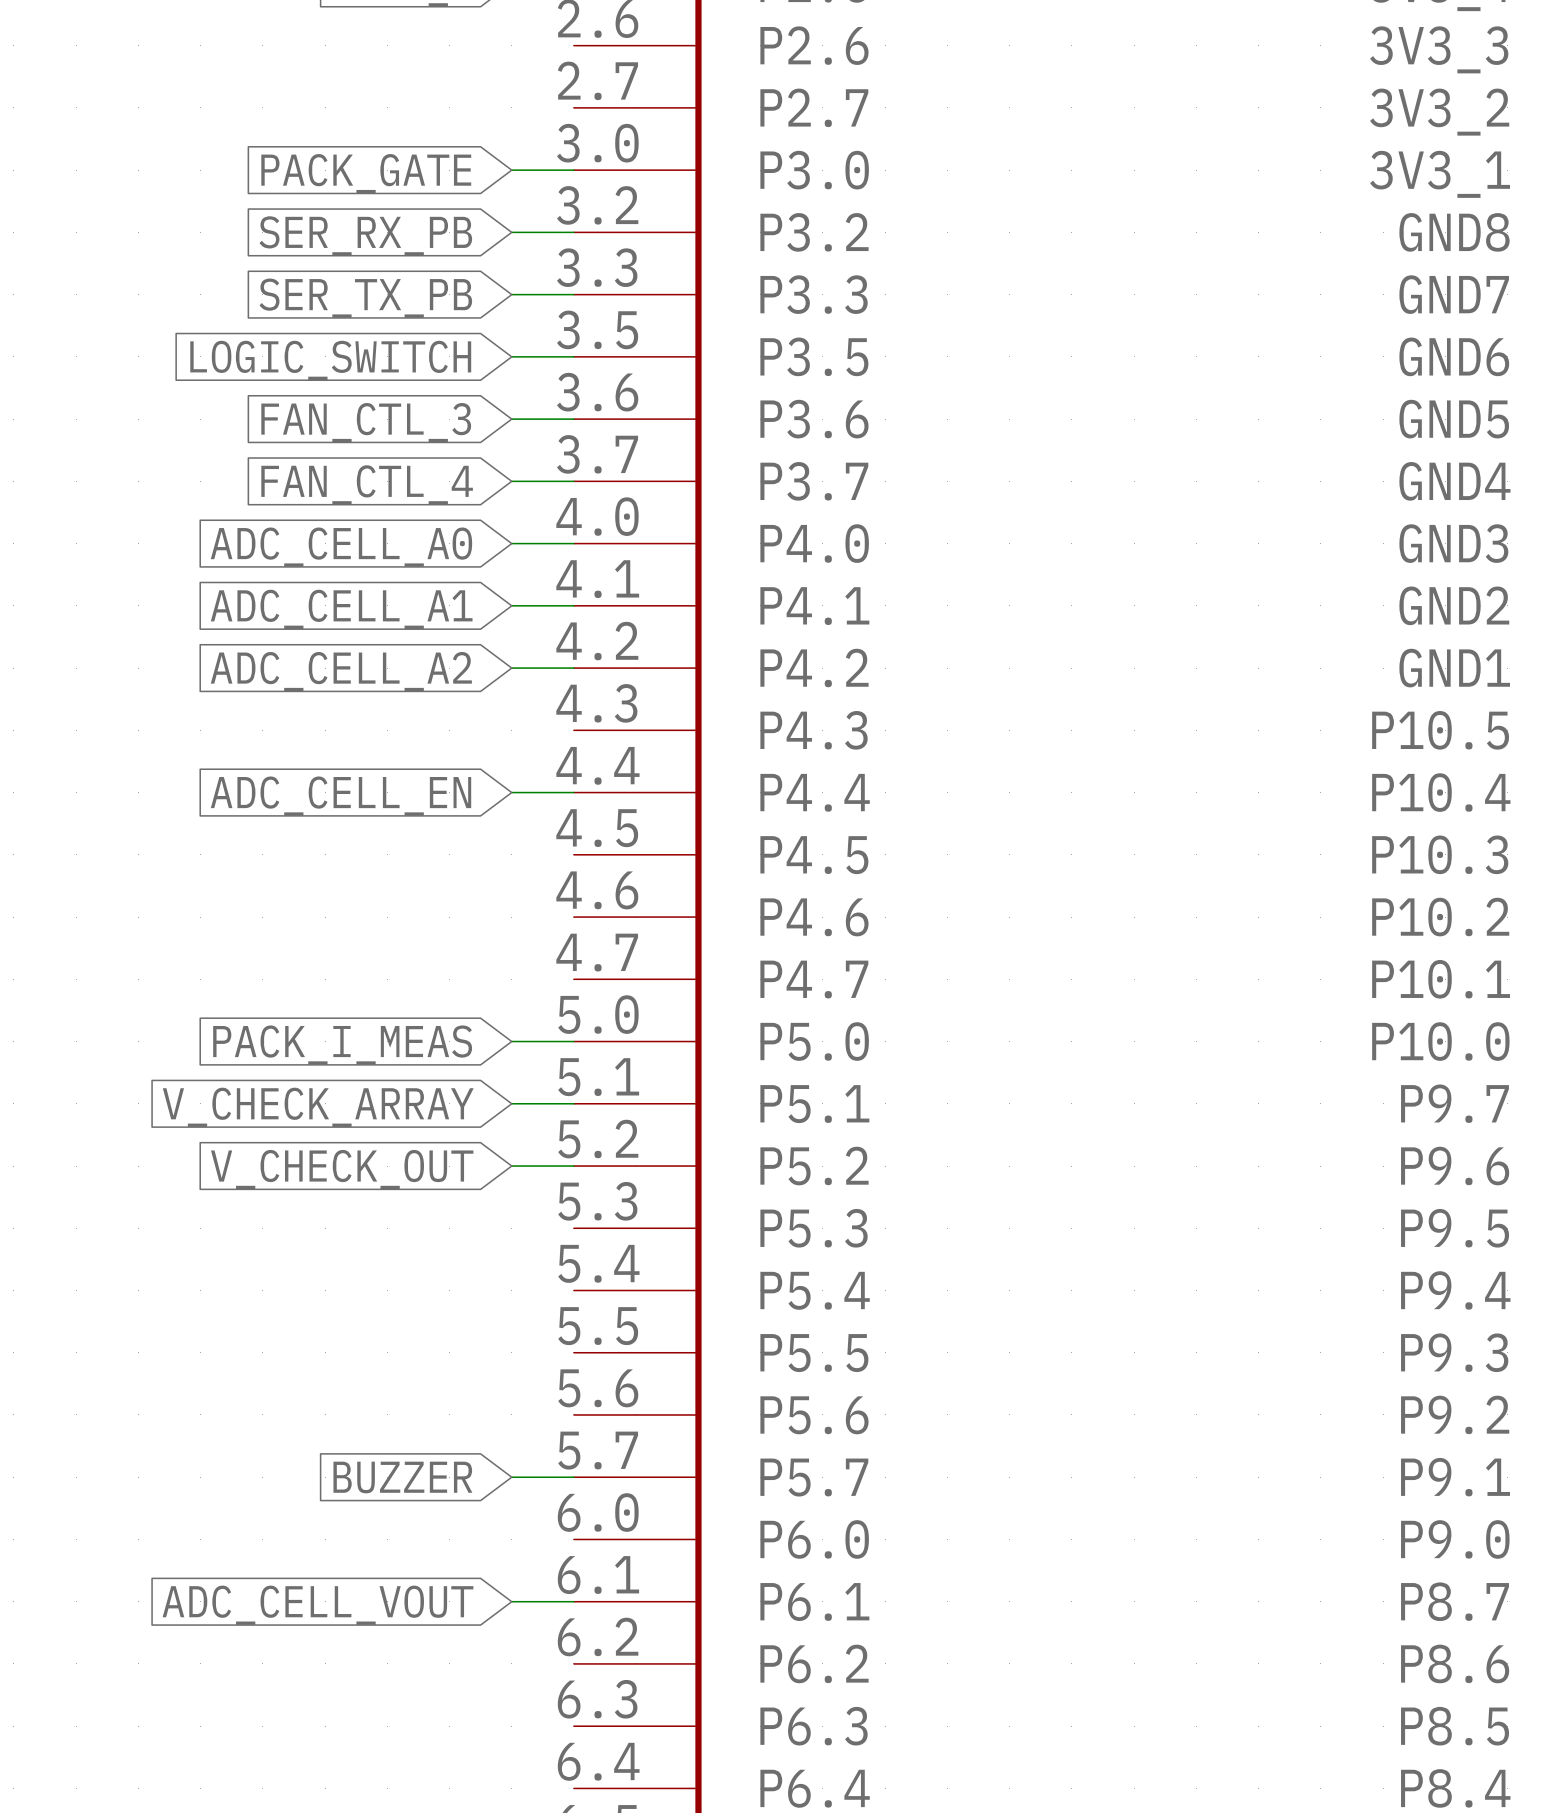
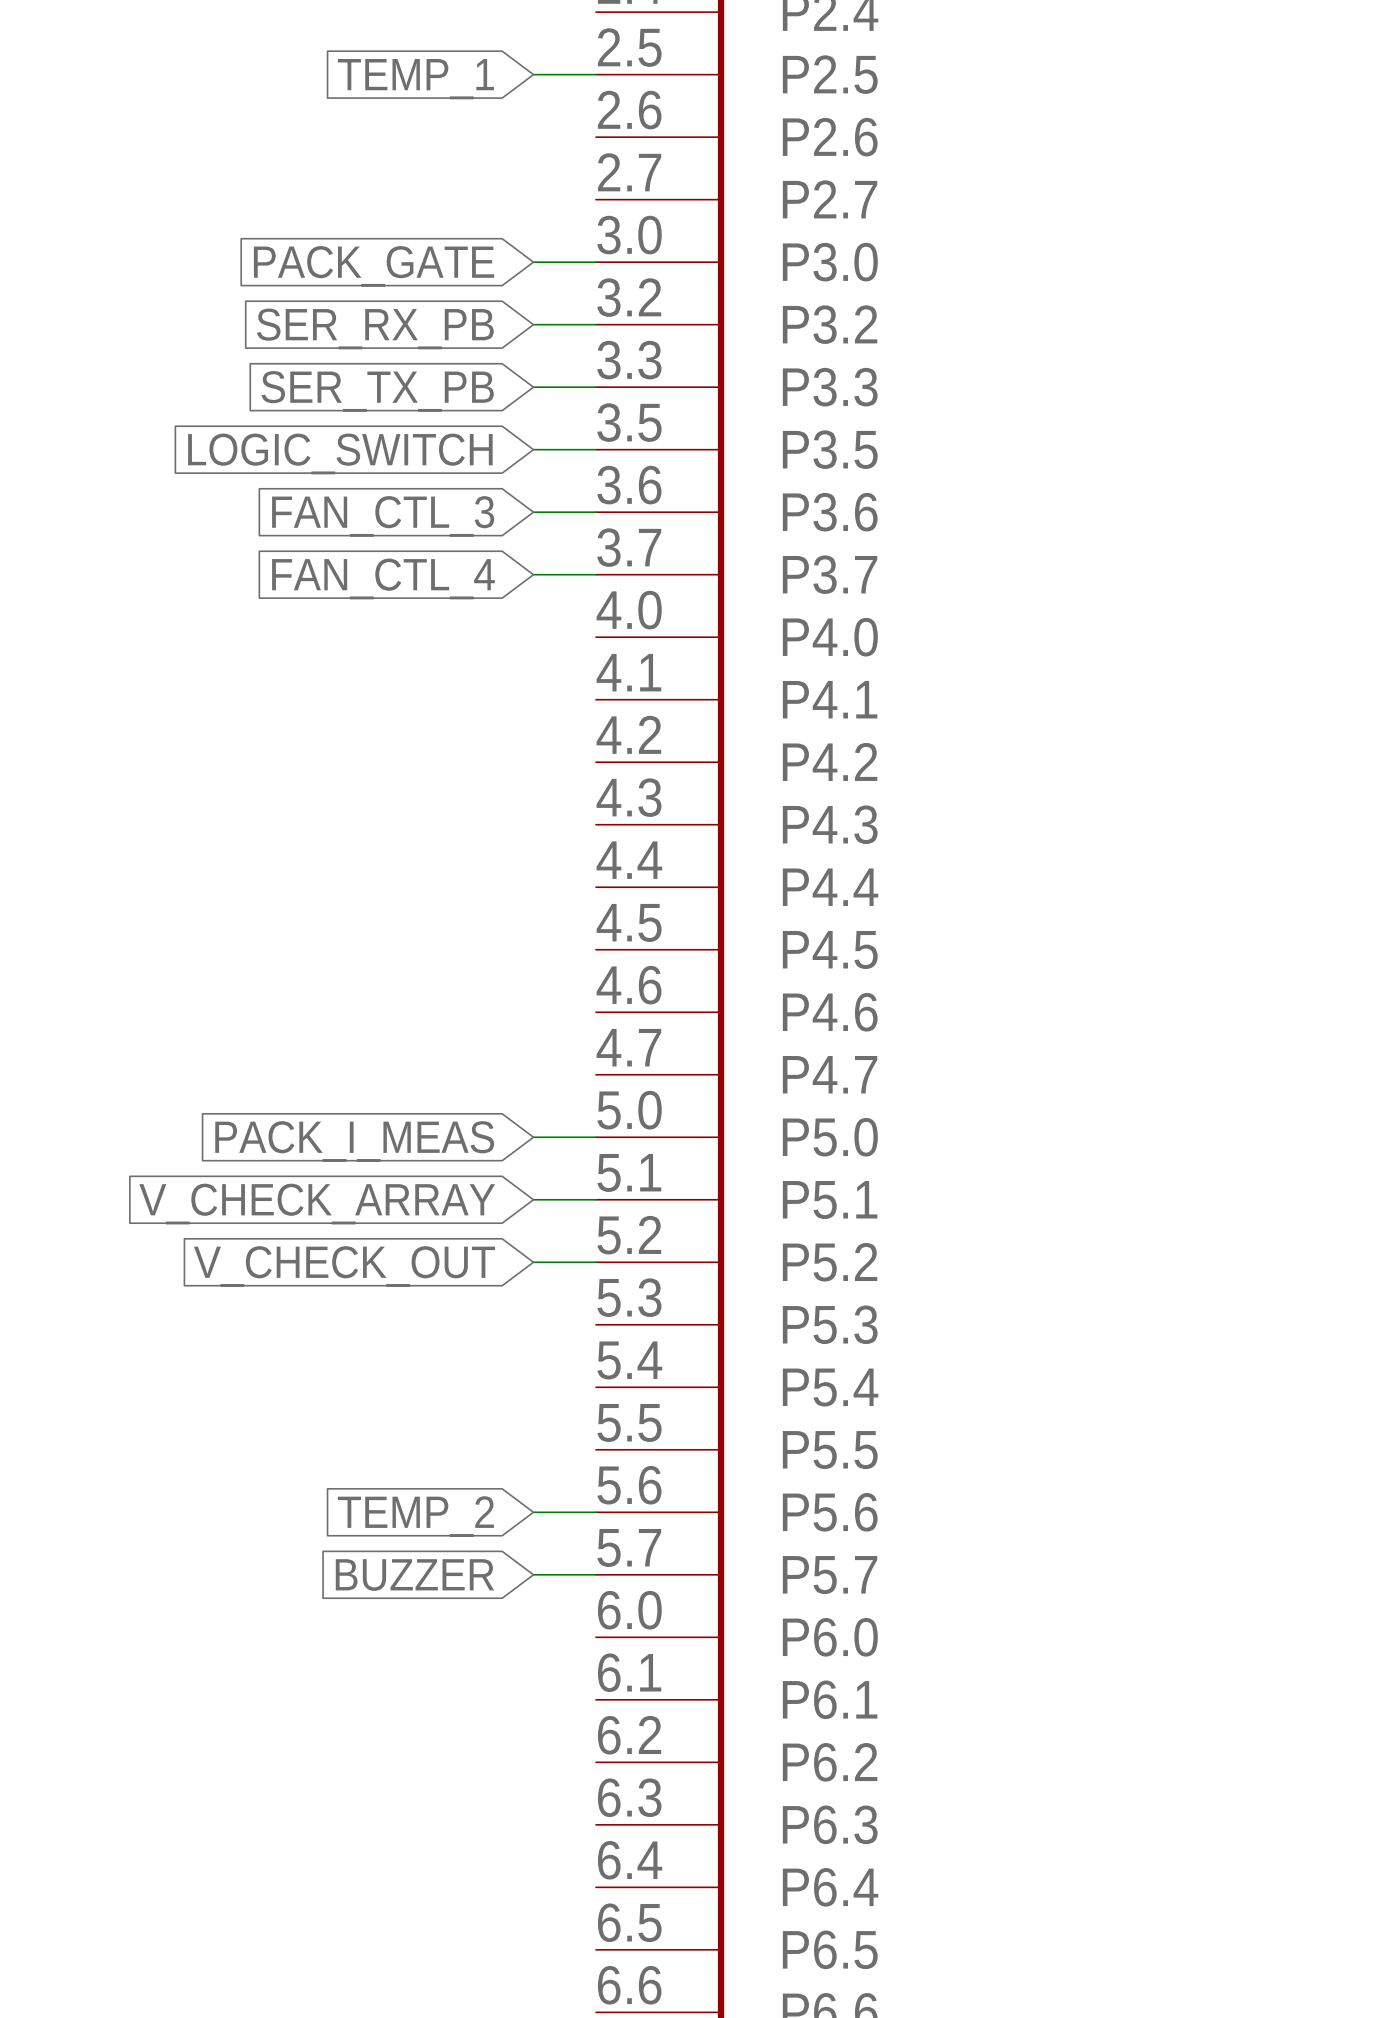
wire: (511, 543) (573, 543) -> none
global label: ADC_CELL_A0 (341, 547) -> none
wire: (511, 605) (573, 605) -> none
global label: ADC_CELL_A1 (341, 609) -> none
wire: (511, 668) (573, 668) -> none
global label: ADC_CELL_A2 (341, 671) -> none
wire: (511, 792) (573, 792) -> none
global label: ADC_CELL_EN (340, 796) -> none
global label: none -> TEMP_2 (415, 1516)
wire: (511, 1601) (573, 1601) -> (533, 1512) (595, 1512)
global label: ADC_CELL_VOUT (318, 1605) -> none

